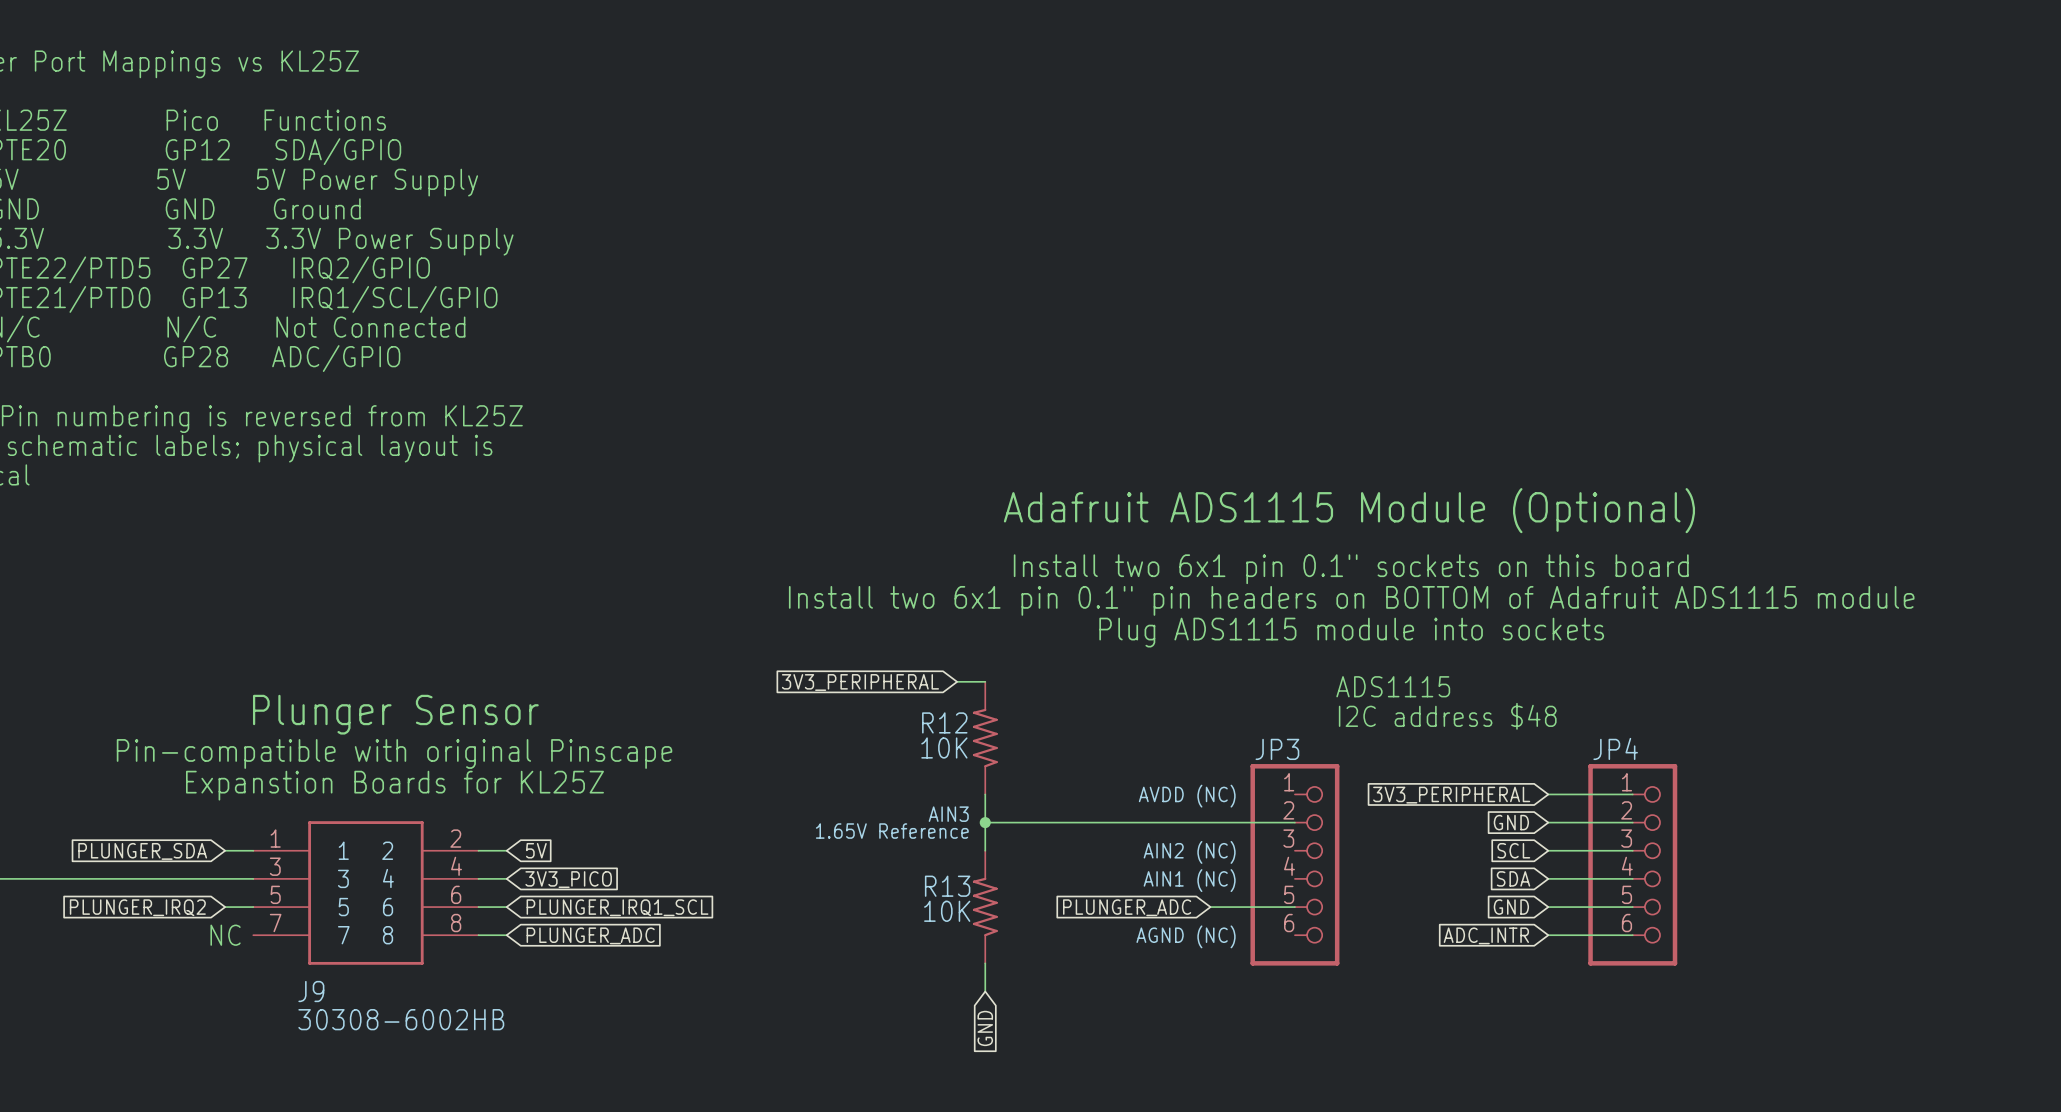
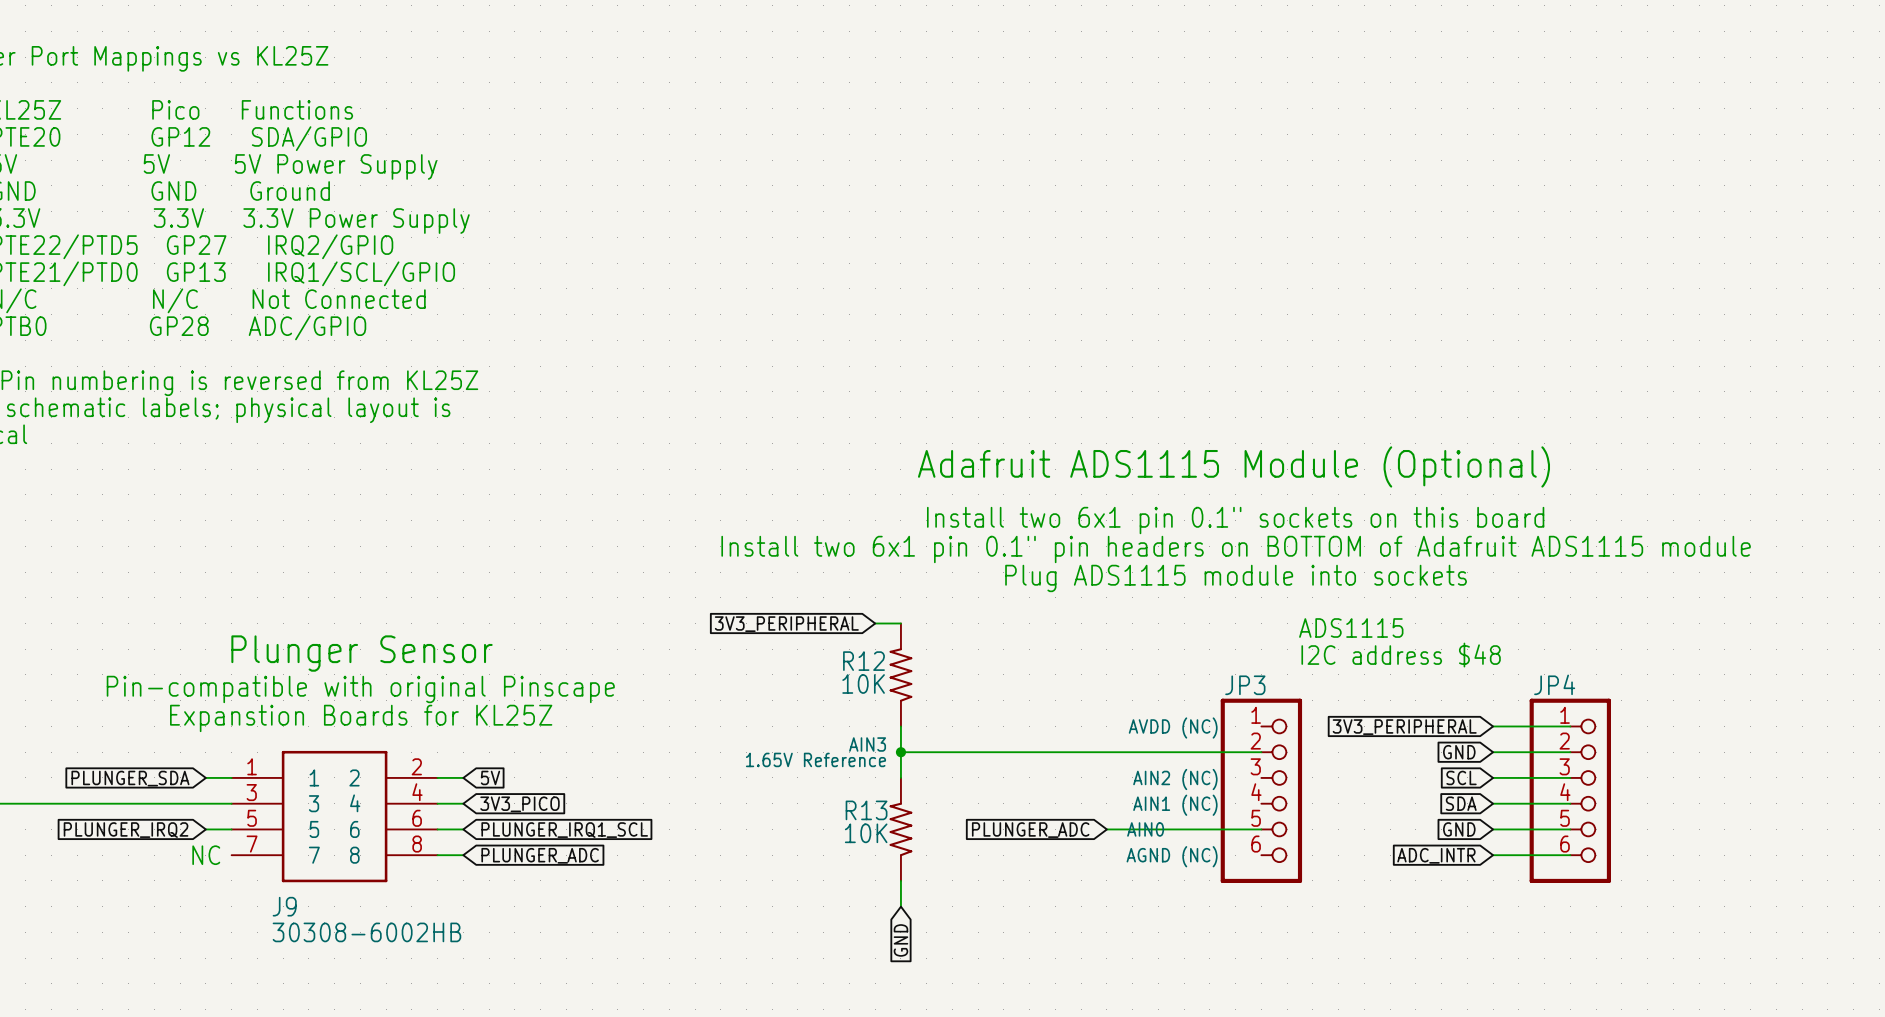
text position: ADS1115 (1393, 686) -> ADS1115 (1351, 628)
text position: I2C address $48 (1447, 716) -> I2C address $48 (1401, 655)
wire: (1548, 794) (1632, 794) -> (1570, 726) (1493, 726)
global label position: 3V3_PERIPHERAL (1451, 795) -> 3V3_PERIPHERAL (1404, 727)
text position: AVDD (NC) (1187, 796) -> AVDD (NC) (1173, 728)
wire: none -> (1184, 752) (1261, 752)
global label: GND (1511, 822) -> none
wire: (1548, 822) (1632, 822) -> (1570, 752) (1493, 752)
global label: none -> GND (1459, 752)
global label position: SCL (1513, 850) -> SCL (1461, 777)
wire: (1548, 850) (1632, 850) -> (1570, 777) (1493, 777)
text position: AIN2 (NC) (1189, 852) -> AIN2 (NC) (1175, 779)
JP3 position: (1294, 864) -> (1261, 790)
JP4 position: (1632, 864) -> (1570, 790)
global label position: SDA (1513, 878) -> SDA (1461, 803)
wire: (1548, 878) (1632, 878) -> (1570, 803) (1493, 803)
text position: AIN1 (NC) (1189, 880) -> AIN1 (NC) (1175, 805)
text: none -> AIN0 (1145, 829)
wire: none -> (1184, 829) (1261, 829)
global label: GND (1511, 907) -> none
wire: (1548, 907) (1632, 907) -> (1570, 829) (1493, 829)
global label: none -> GND (1459, 829)
global label position: ADC_INTR (1486, 935) -> ADC_INTR (1436, 855)
wire: (1548, 935) (1632, 935) -> (1570, 855) (1493, 855)
text position: AGND (NC) (1186, 936) -> AGND (NC) (1172, 856)

